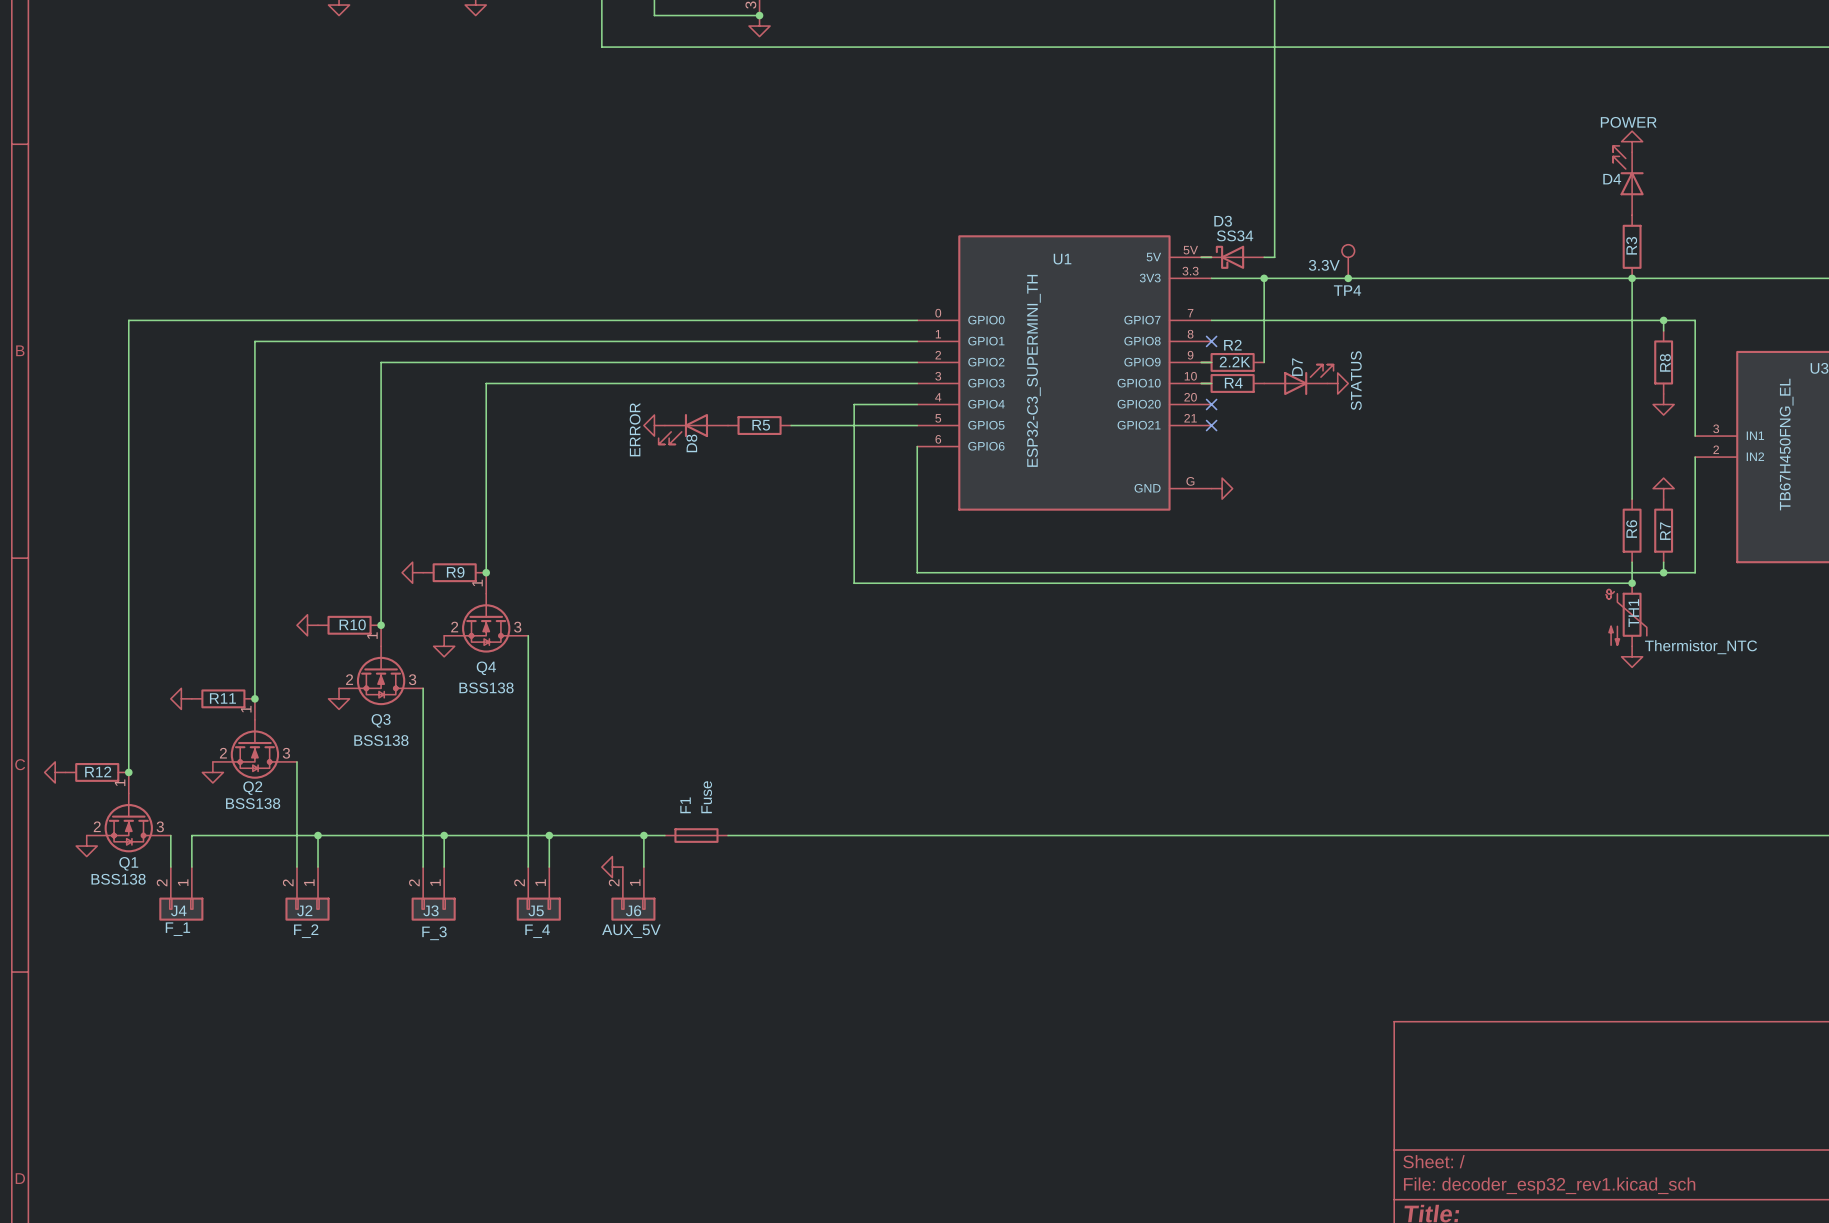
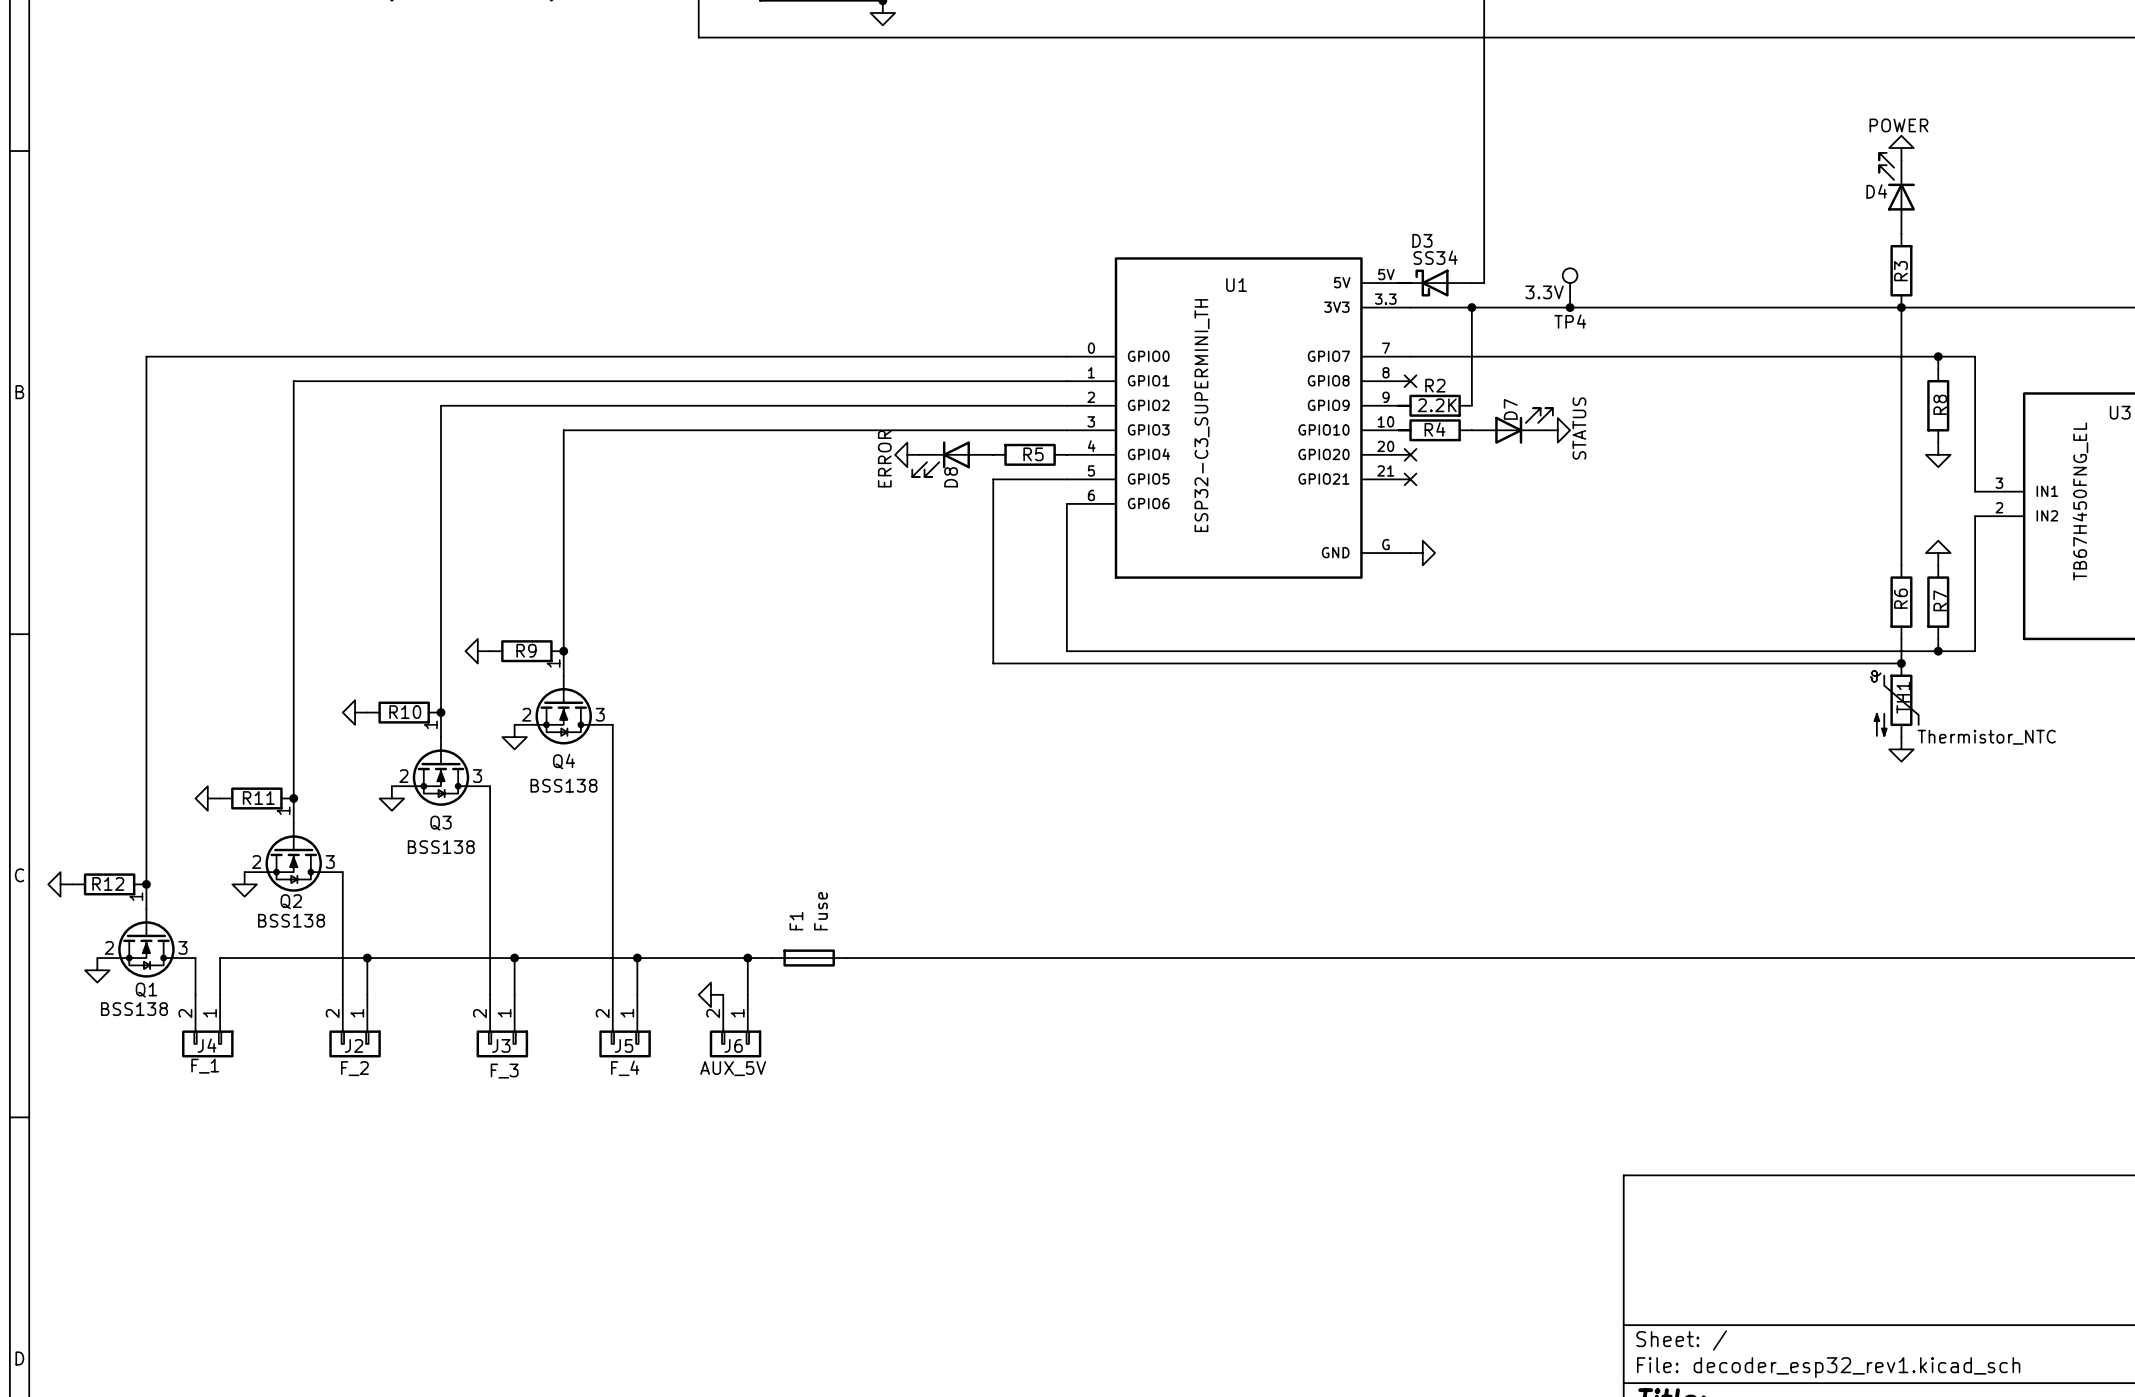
wire: (917, 404) (854, 404) (854, 425) (791, 425) -> none
power symbol position: (654, 425) -> (907, 454)
R5 position: (759, 425) -> (1030, 454)
D8 position: (693, 429) -> (952, 459)

